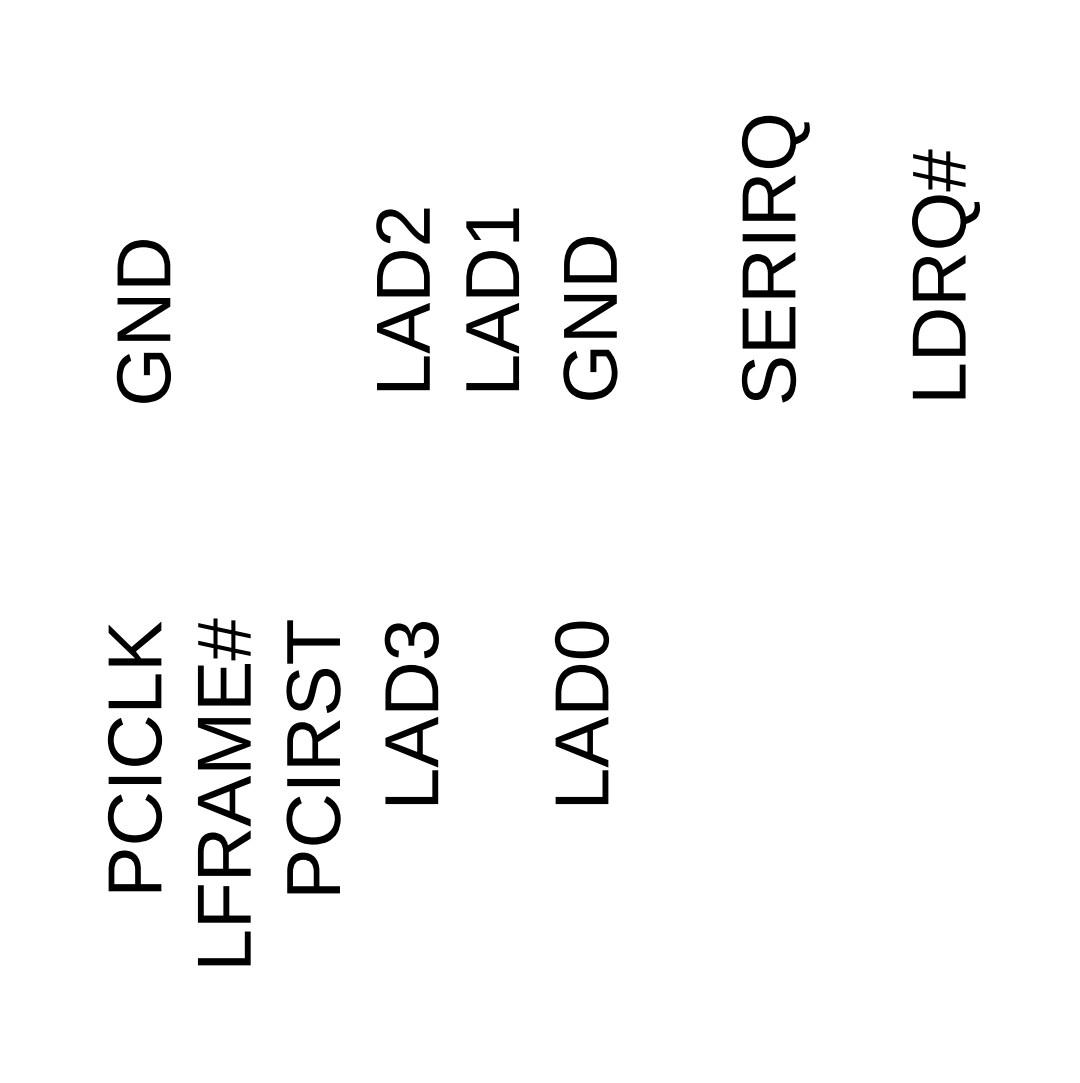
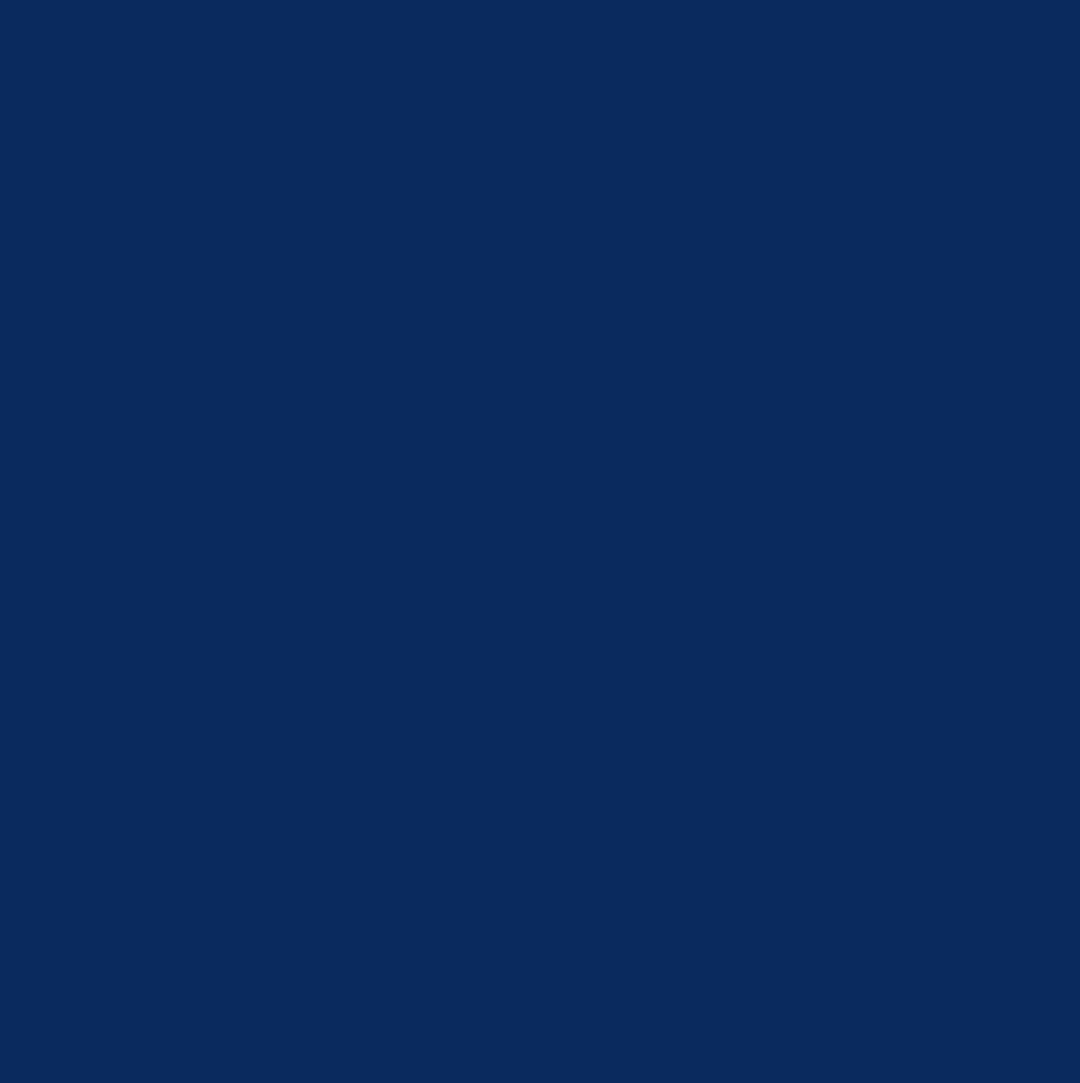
text: SERIRQ (775, 259) -> none
text: LDRQ# (946, 273) -> none
text: LAD2 (402, 299) -> none
text: LAD1 (492, 299) -> none
text: GND (590, 318) -> none
text: GND (143, 321) -> none
text: LAD0 (581, 712) -> none
text: LAD3 (411, 713) -> none
text: PCICLK (134, 756) -> none
text: PCIRST (313, 756) -> none
text: LFRAME# (224, 791) -> none

